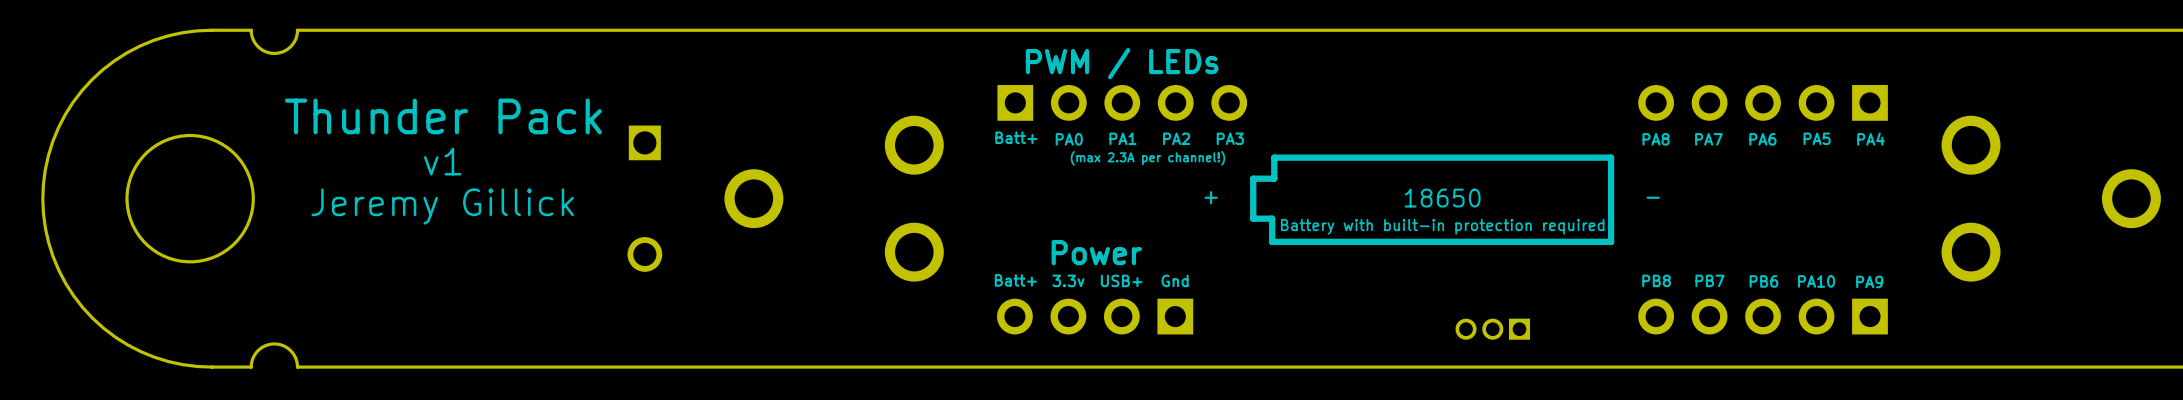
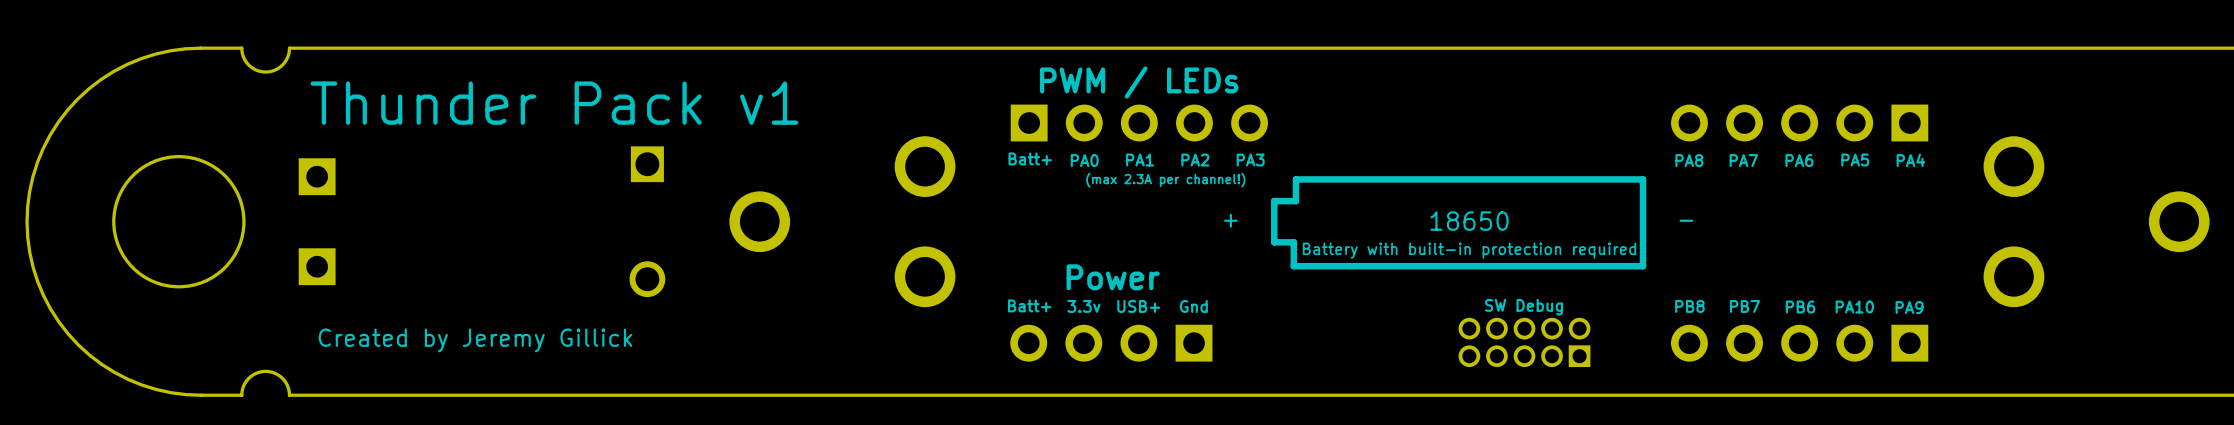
text: Thunder Pack (443, 116) -> Thunder Pack v1 (554, 103)
part: none -> (317, 176)
text: v1 (442, 161) -> none
text: Jeremy Gillick (442, 206) -> none
part: none -> (317, 266)
part value: none -> SW Debug (1524, 307)
text: none -> Created by Jeremy Gillick (475, 340)
part footprint: [1455, 318, 1531, 340] -> [1458, 317, 1591, 368]

